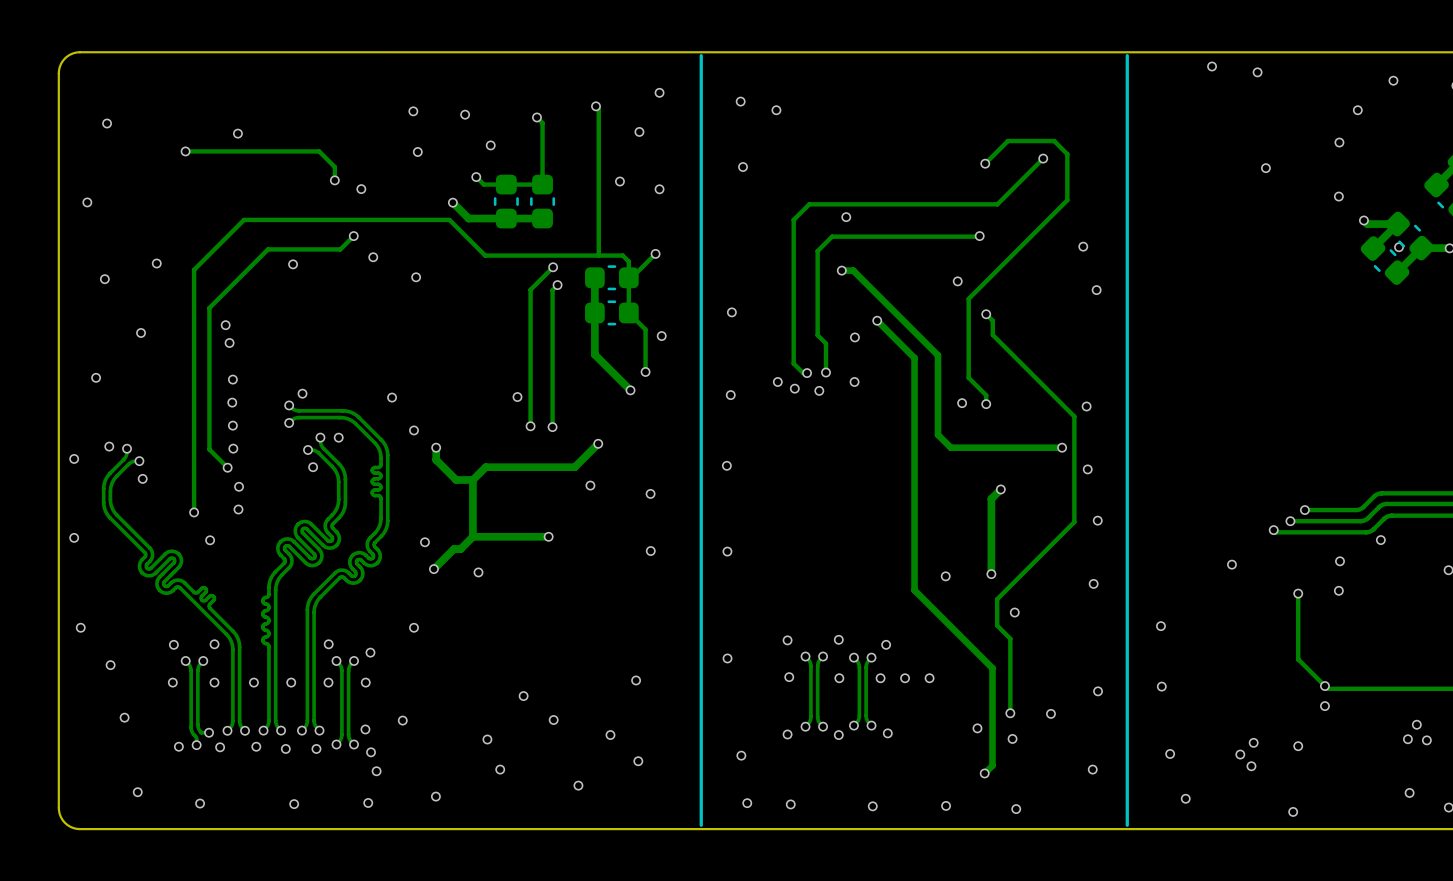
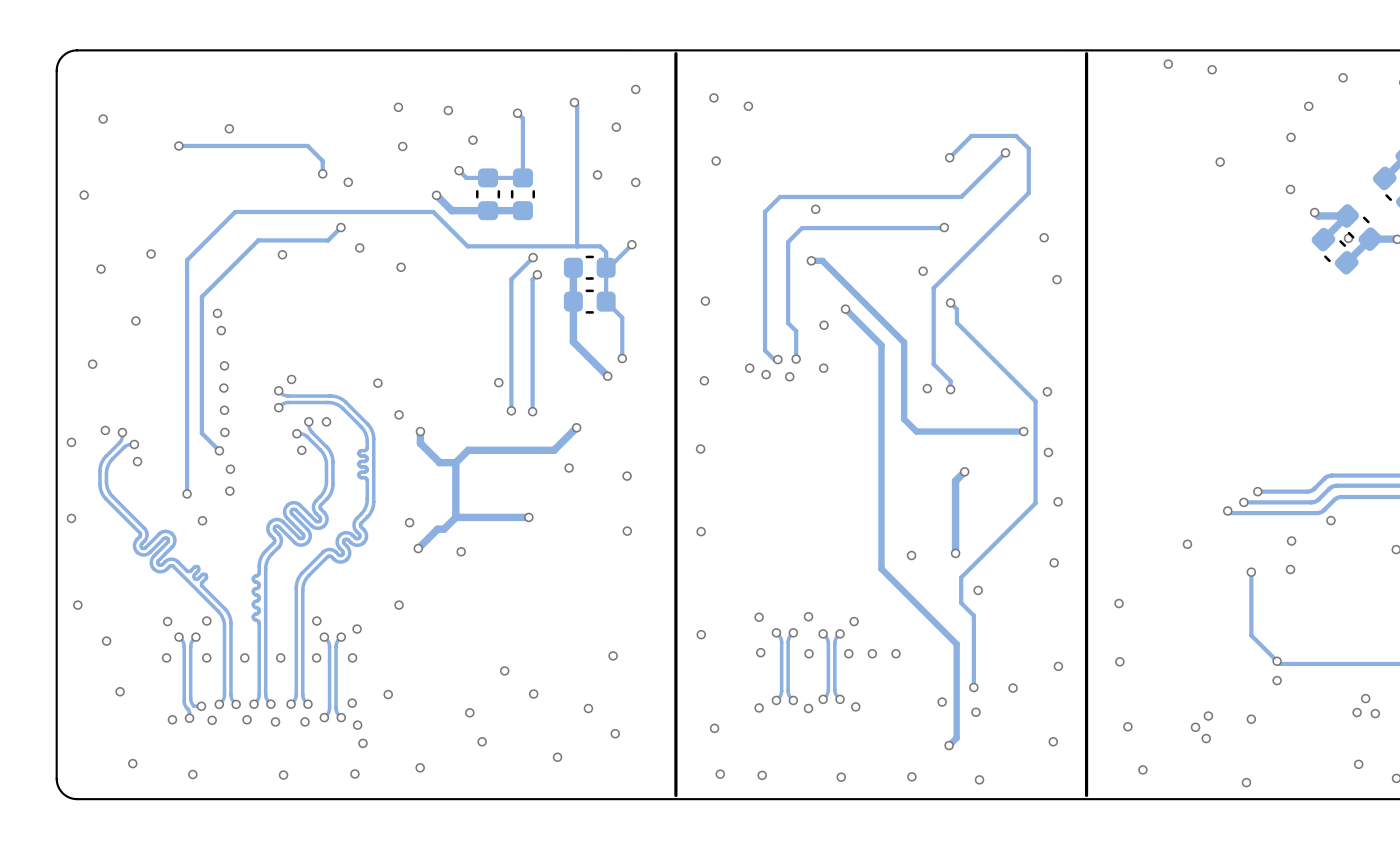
via: (661, 336) -> none

